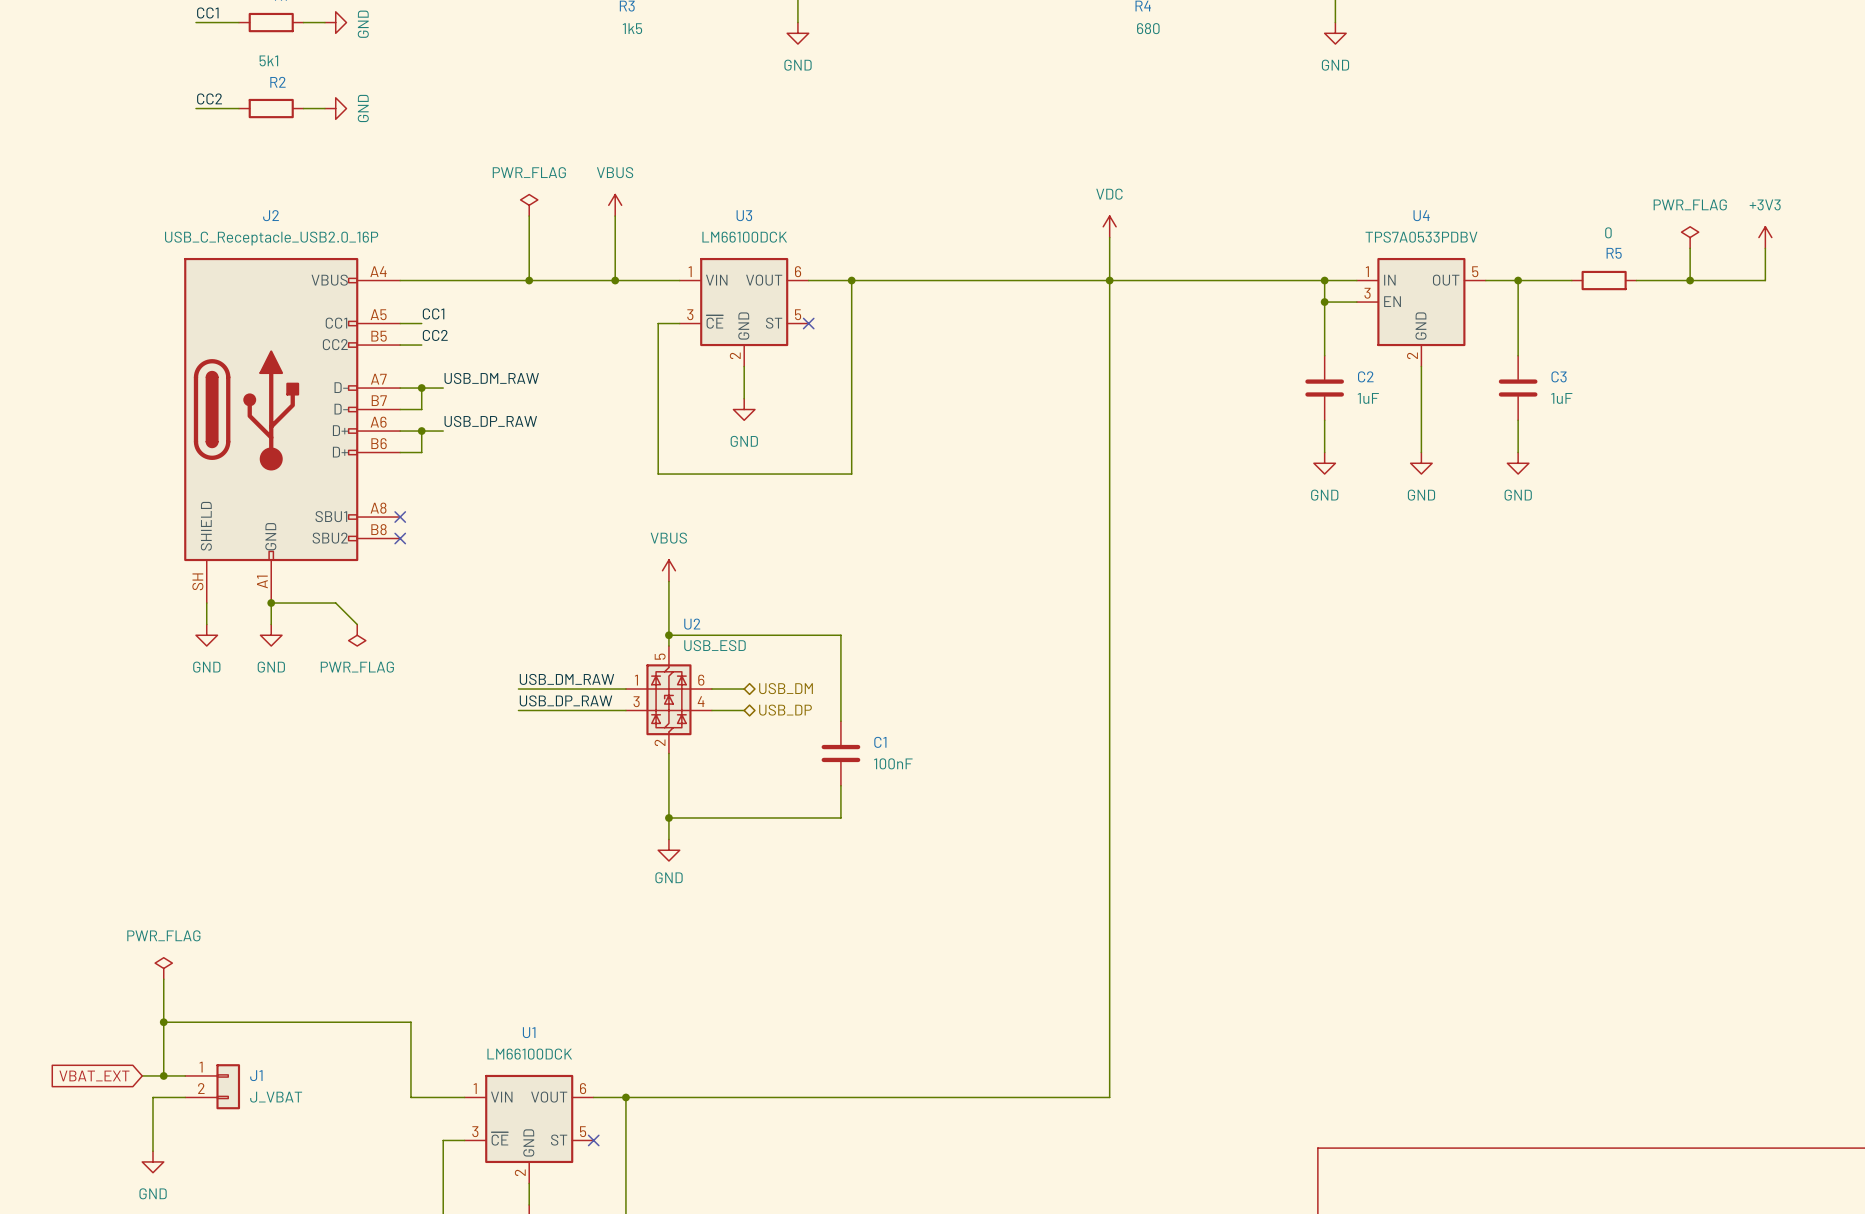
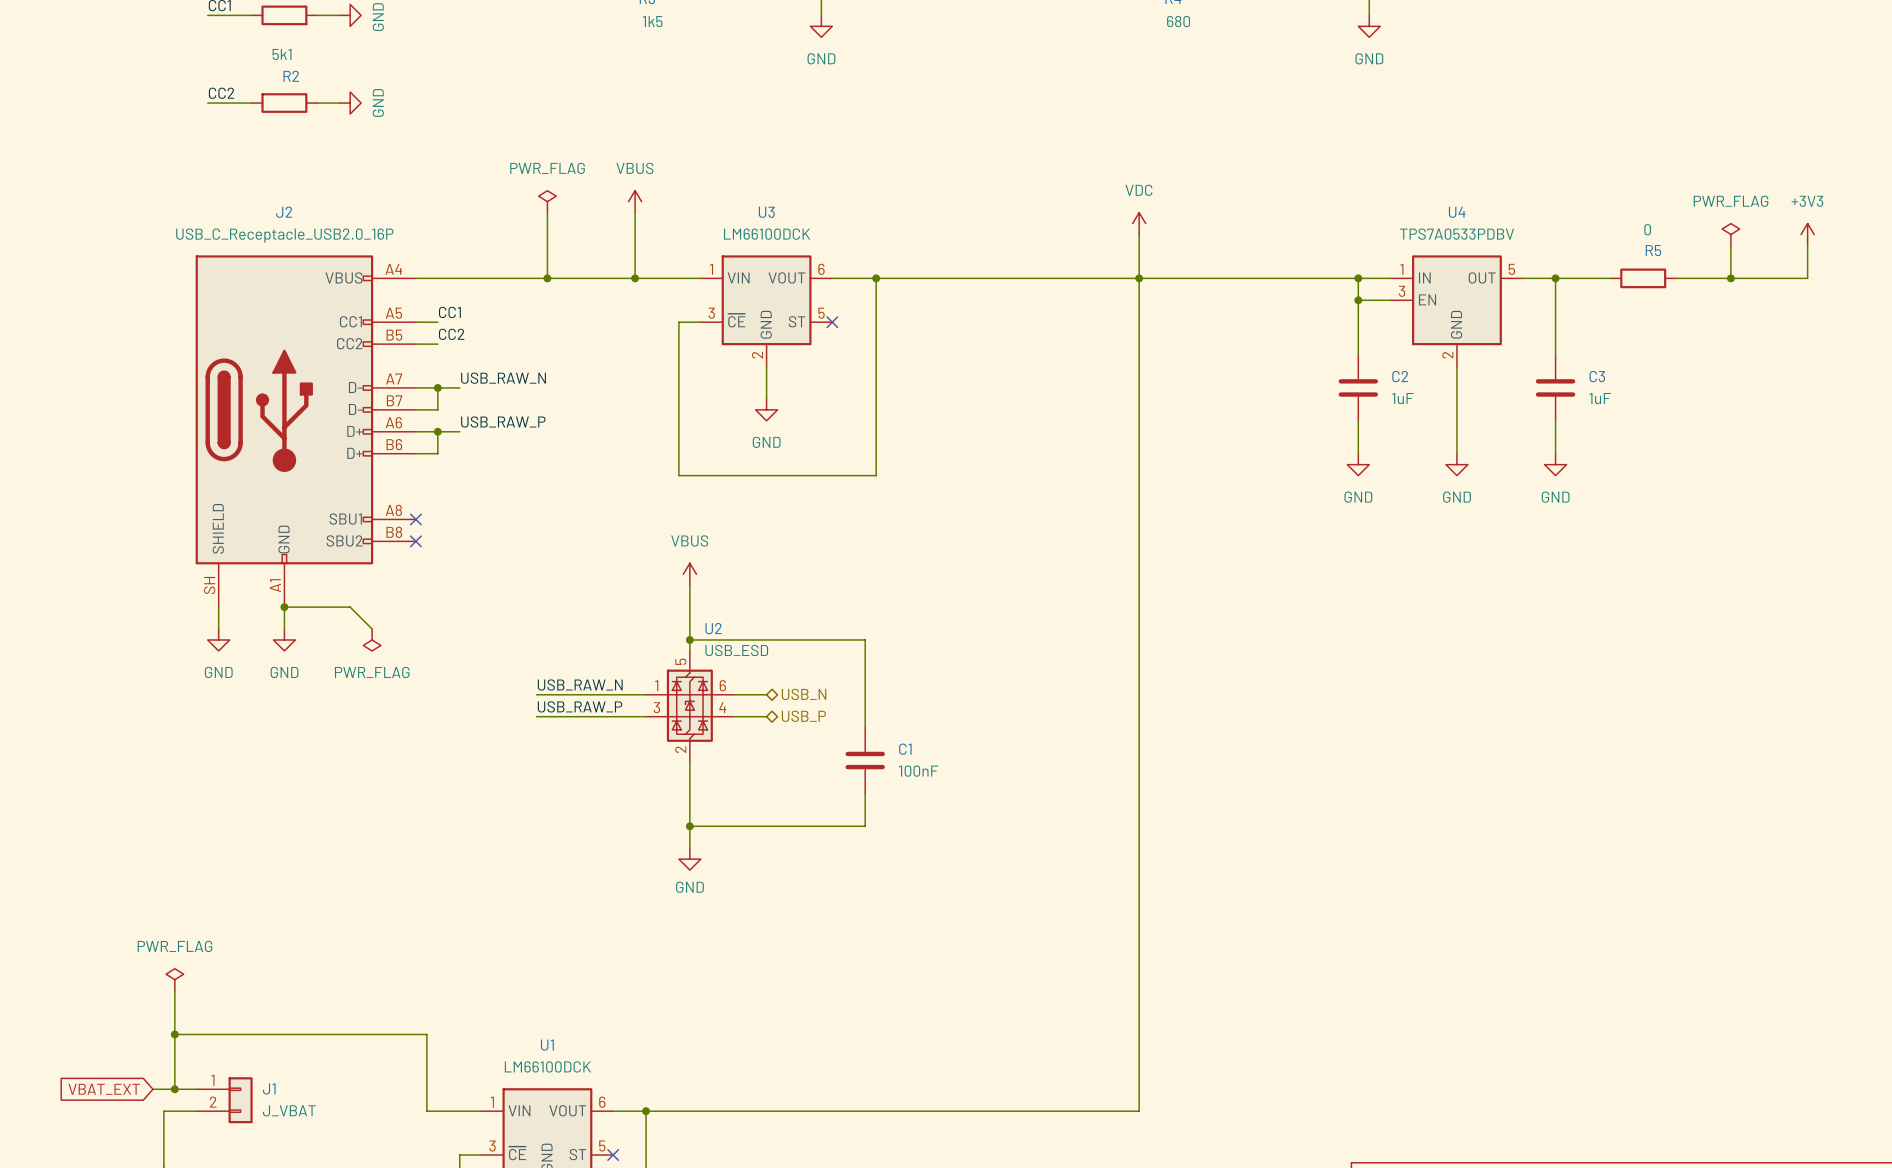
label: USB_DM_RAW (491, 378) -> USB_RAW_N (503, 378)
label: USB_DP_RAW (490, 421) -> USB_RAW_P (503, 422)
label: USB_DM_RAW (566, 679) -> USB_RAW_N (580, 685)
hierarchical label: USB_DM (786, 688) -> USB_N (804, 694)
label: USB_DP_RAW (566, 700) -> USB_RAW_P (580, 706)
hierarchical label: USB_DP (785, 710) -> USB_P (803, 716)

